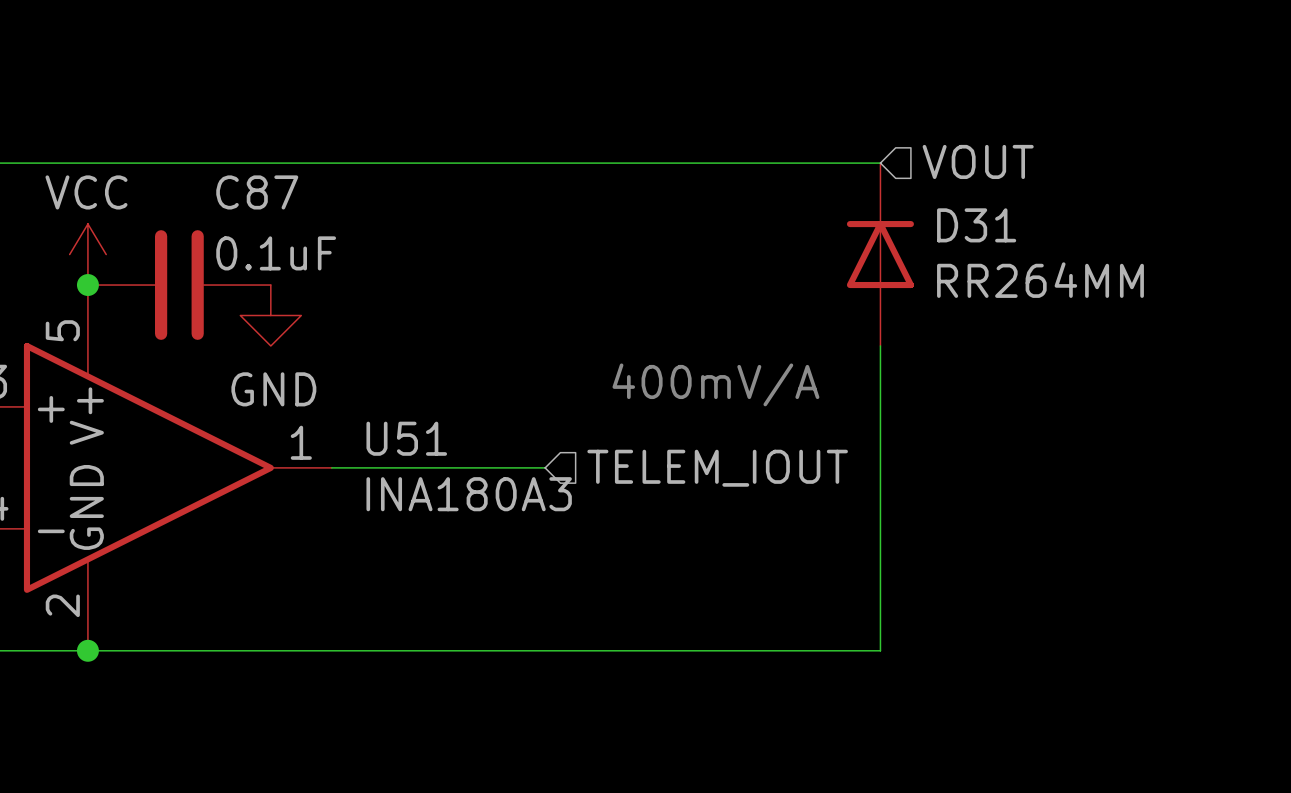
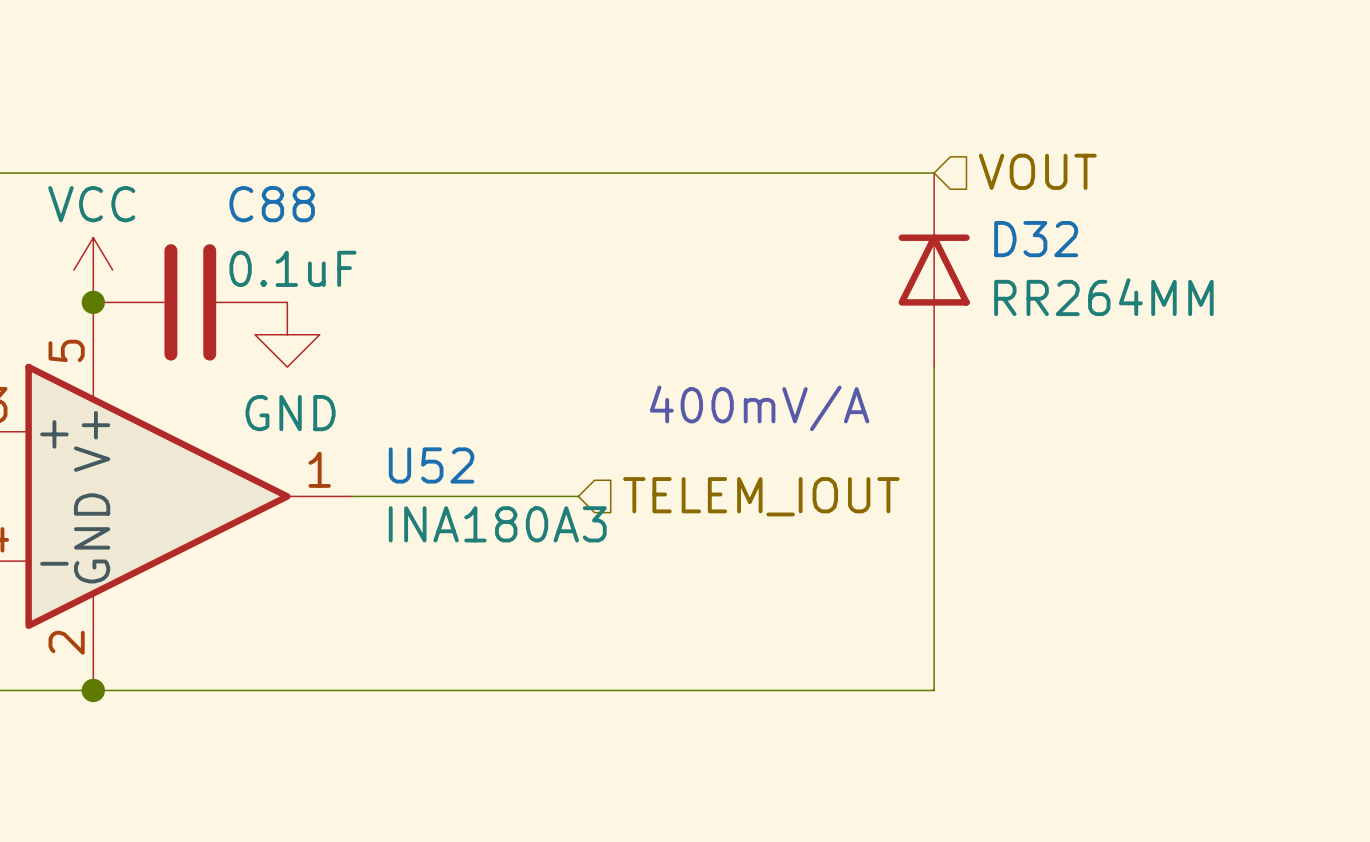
C87 name: C87 (257, 192) -> C88 (272, 204)
D31 name: D31 (976, 225) -> D32 (1036, 239)
U51 name: U51 (406, 438) -> U52 (431, 465)

